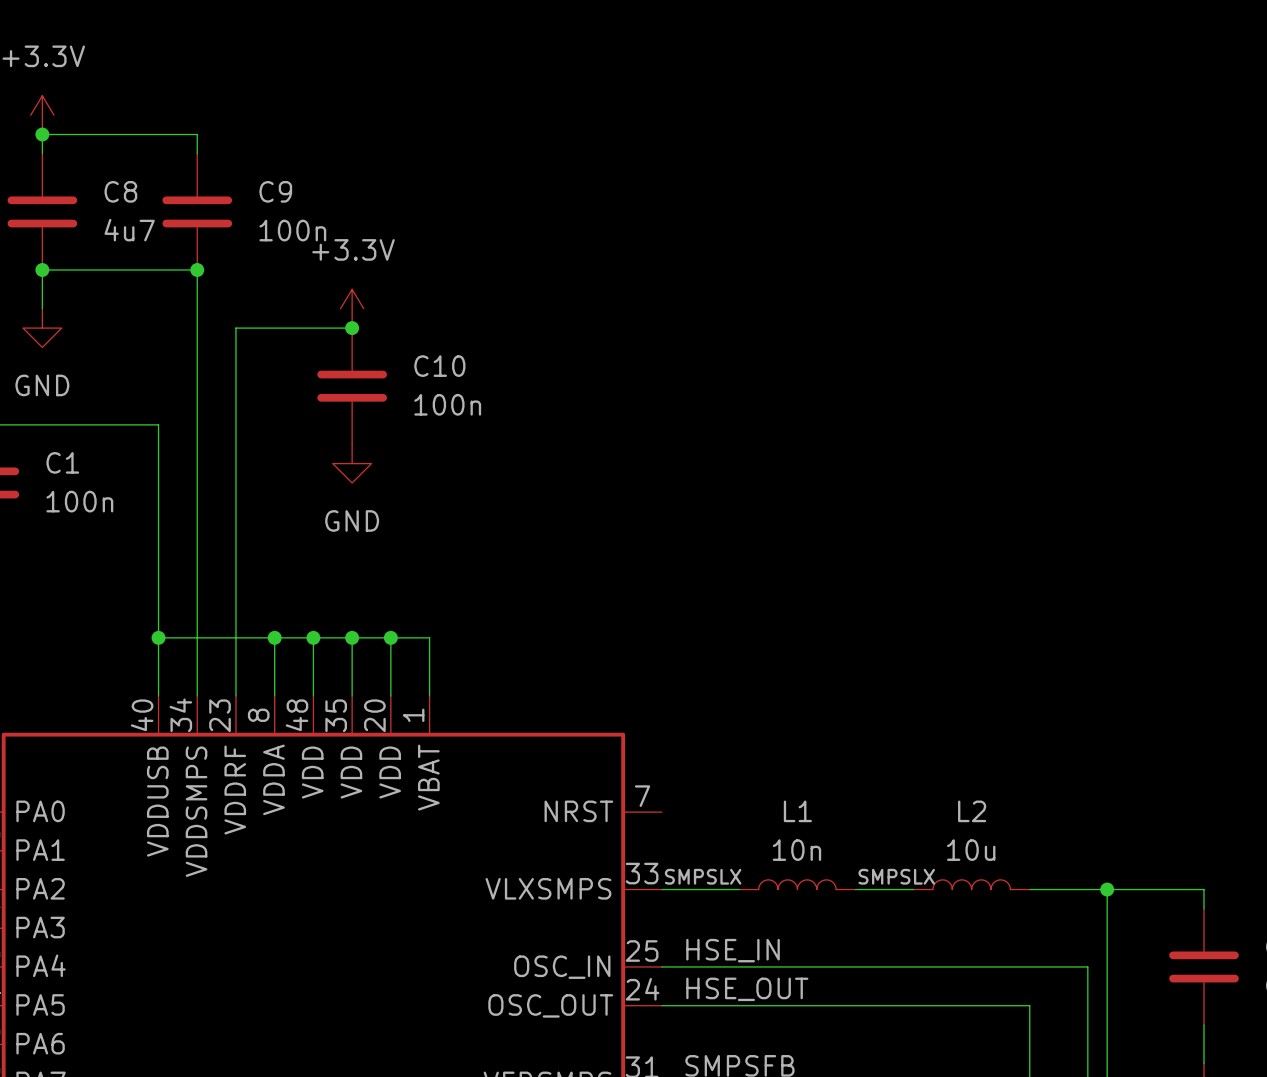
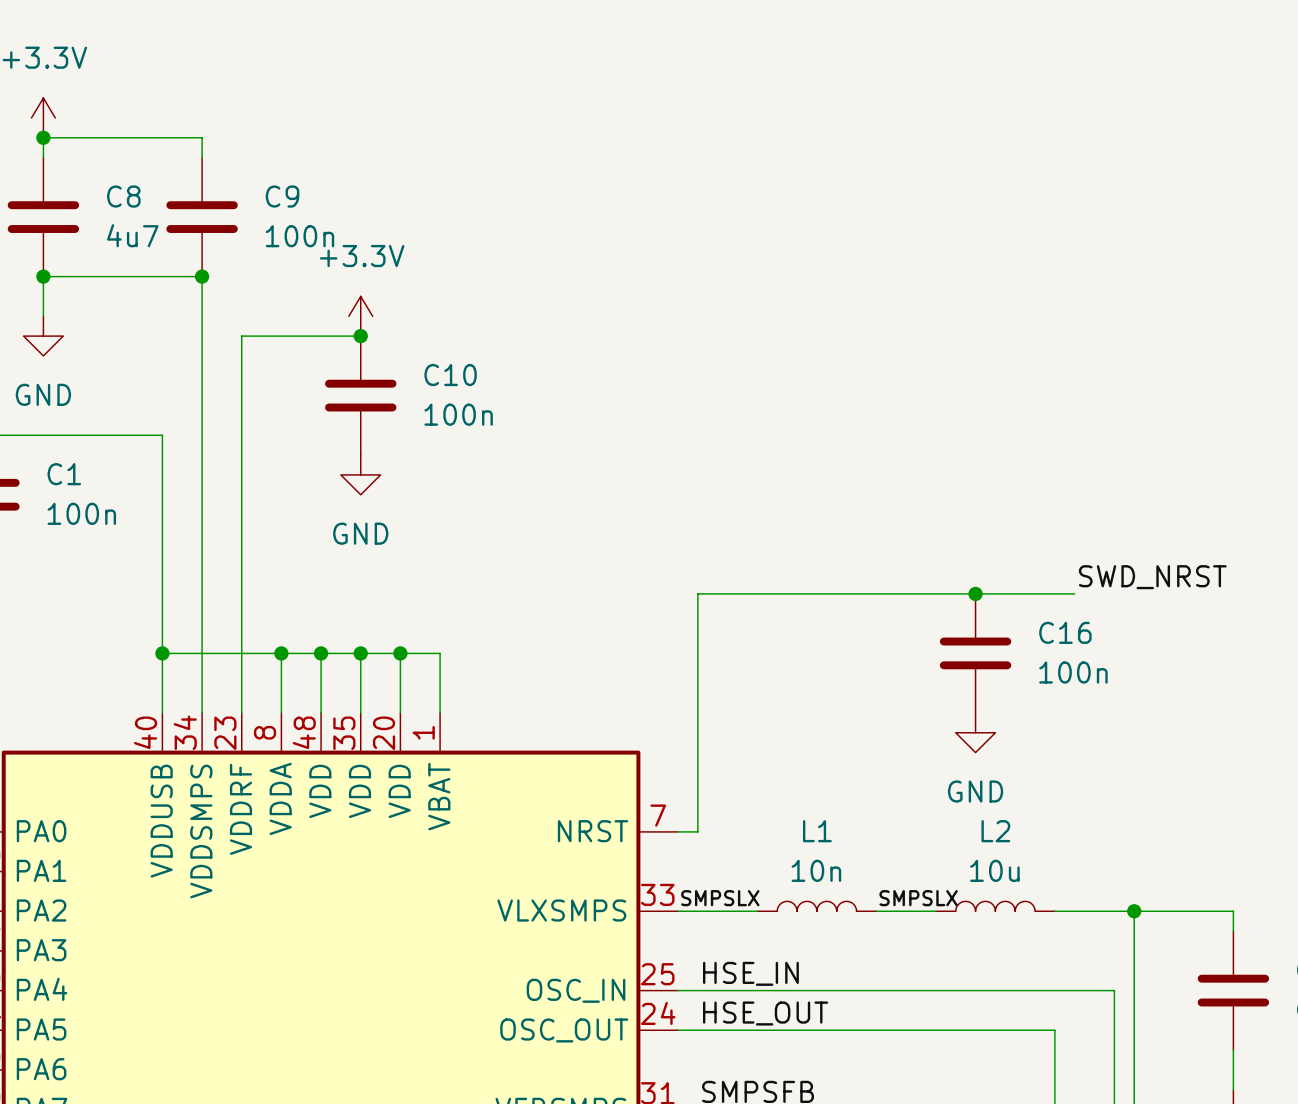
label: none -> SWD_NRST (1152, 577)
junction: none -> (975, 593)
wire: none -> (1074, 593) (697, 593) (697, 831) (678, 831)
C16: none -> 100n (975, 653)
power symbol: none -> GND (975, 732)

